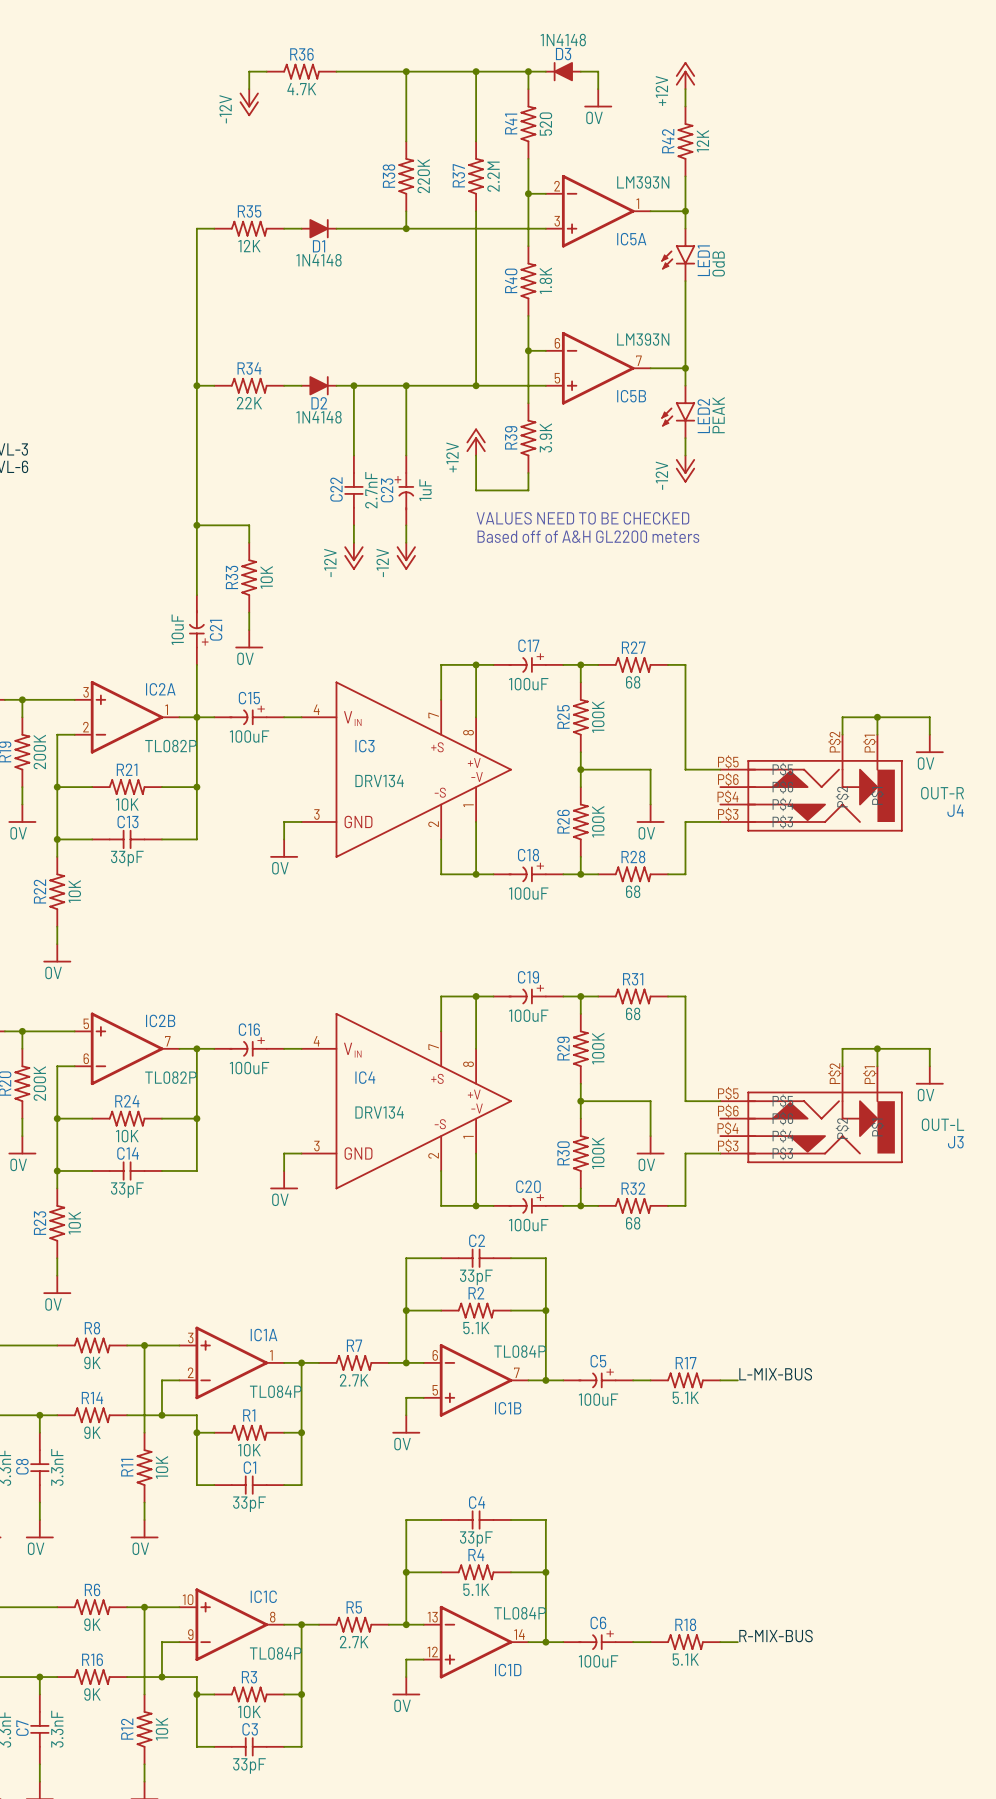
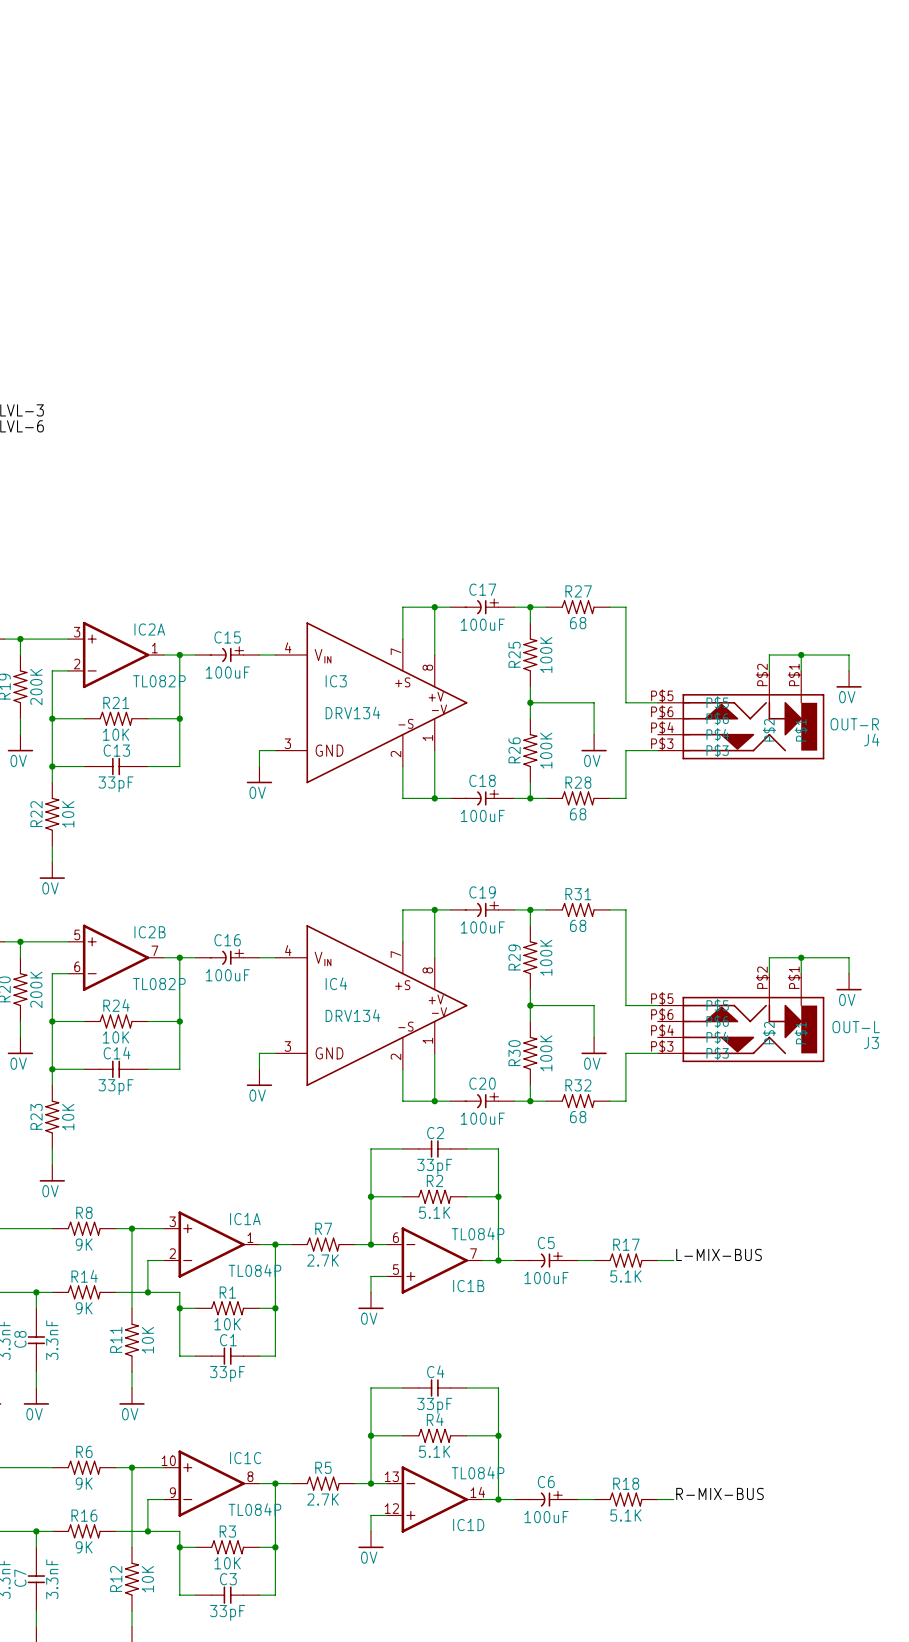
wire: (266, 71) (249, 71) (249, 89) -> none
R36: 4.7K (301, 71) -> none
wire: (336, 71) (545, 71) -> none
wire: (406, 71) (406, 141) -> none
junction: (406, 71) -> none
wire: (476, 71) (476, 141) -> none
junction: (476, 71) -> none
wire: (528, 71) (528, 89) -> none
junction: (528, 71) -> none
D3: 1N4148 (563, 71) -> none
wire: (580, 71) (598, 71) (598, 89) -> none
power symbol: +12V (685, 75) -> none
wire: (685, 89) (685, 106) -> none
power symbol: 0V (598, 98) -> none
power symbol: -12V (249, 102) -> none
R41: 520 (528, 123) -> none
R42: 12K (685, 141) -> none
wire: (528, 158) (528, 246) -> none
R38: 220K (406, 176) -> none
R37: 2.2M (476, 176) -> none
wire: (685, 176) (685, 228) -> none
wire: (528, 193) (545, 193) -> none
junction: (528, 193) -> none
wire: (406, 211) (406, 228) -> none
wire: (476, 211) (476, 385) -> none
IC5A: LM393N (598, 211) -> none
wire: (650, 211) (685, 211) -> none
junction: (685, 211) -> none
wire: (214, 228) (196, 228) (196, 595) -> none
R35: 12K (249, 228) -> none
wire: (284, 228) (301, 228) -> none
D1: 1N4148 (319, 228) -> none
wire: (336, 228) (545, 228) -> none
junction: (406, 228) -> none
LED1: 0dB (678, 254) -> none
R40: 1.8K (528, 281) -> none
wire: (685, 281) (685, 385) -> none
wire: (528, 315) (528, 403) -> none
wire: (528, 350) (545, 350) -> none
junction: (528, 350) -> none
IC5B: LM393N (598, 368) -> none
wire: (650, 368) (685, 368) -> none
junction: (685, 368) -> none
wire: (196, 385) (214, 385) -> none
junction: (196, 385) -> none
R34: 22K (249, 385) -> none
wire: (284, 385) (301, 385) -> none
D2: 1N4148 (319, 385) -> none
wire: (336, 385) (545, 385) -> none
wire: (353, 385) (353, 455) -> none
junction: (353, 385) -> none
wire: (406, 385) (406, 455) -> none
junction: (406, 385) -> none
junction: (476, 385) -> none
LED2: PEAK (678, 411) -> none
R39: 3.9K (528, 438) -> none
wire: (685, 438) (685, 455) -> none
power symbol: +12V (476, 442) -> none
wire: (476, 455) (476, 490) (528, 490) (528, 472) -> none
power symbol: -12V (685, 469) -> none
C22: 2.7nF (353, 490) -> none
C23: 1uF (406, 490) -> none
text: VALUES NEED TO BE CHECKED (582, 518) -> none
wire: (196, 525) (249, 525) (249, 542) -> none
junction: (196, 525) -> none
wire: (353, 525) (353, 542) -> none
wire: (406, 525) (406, 542) -> none
text: Based off of A&H GL2200 meters (588, 536) -> none
power symbol: -12V (353, 556) -> none
power symbol: -12V (406, 556) -> none
R33: 10K (249, 577) -> none
wire: (249, 612) (249, 630) -> none
C21: 10uF (196, 630) -> none
power symbol: 0V (249, 639) -> none
wire: (196, 664) (196, 717) -> none

